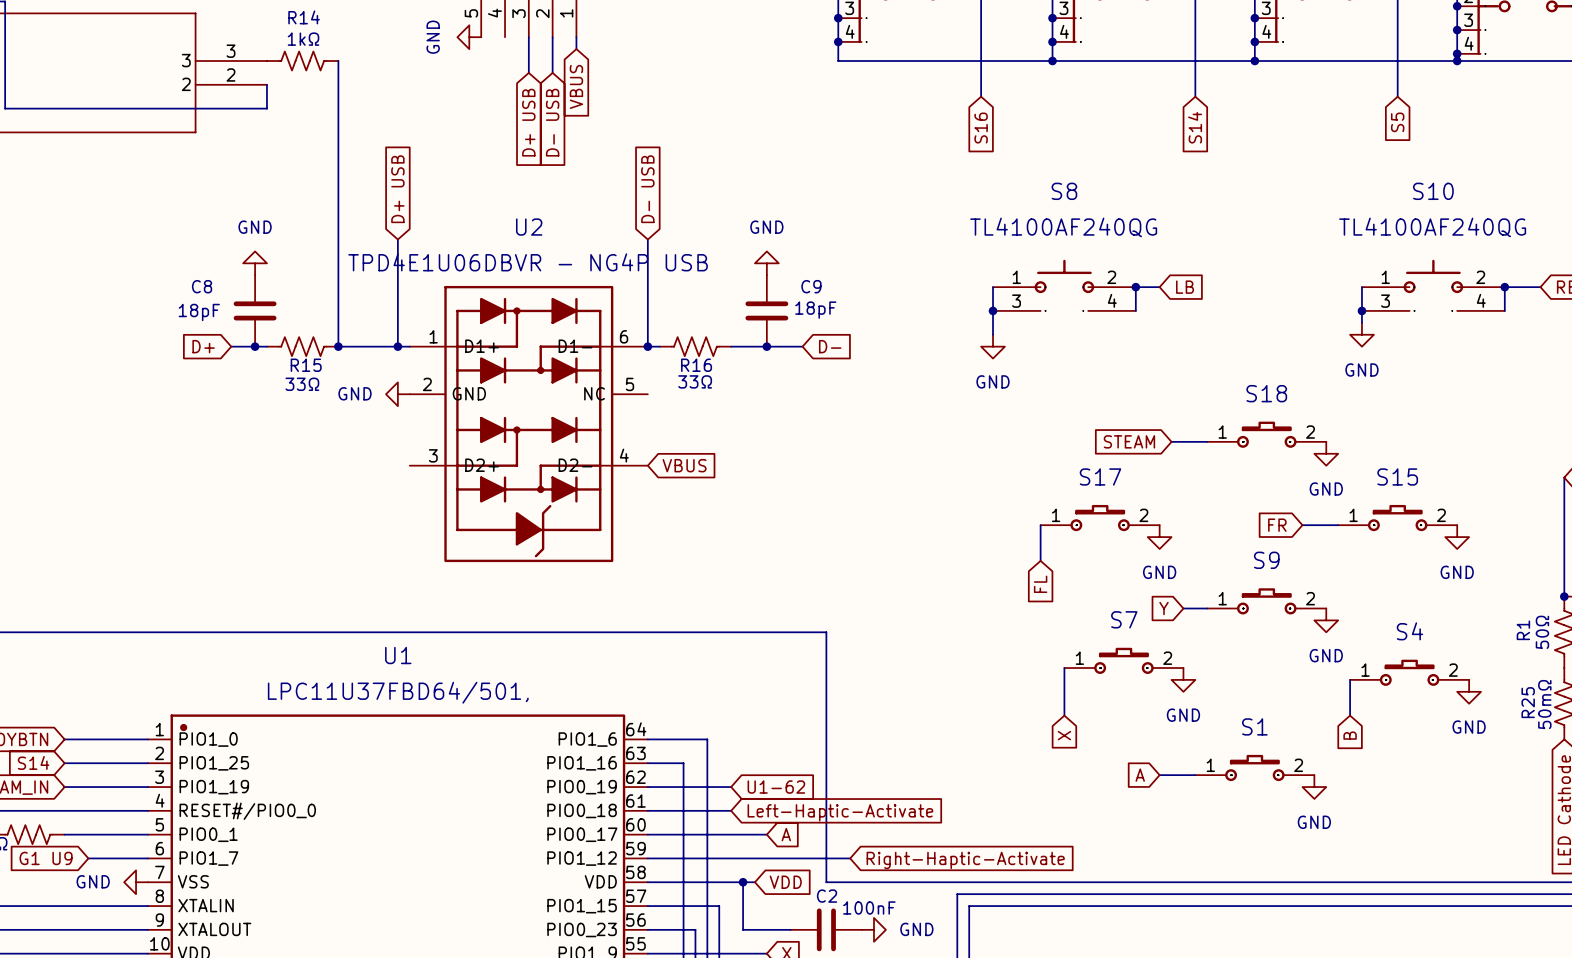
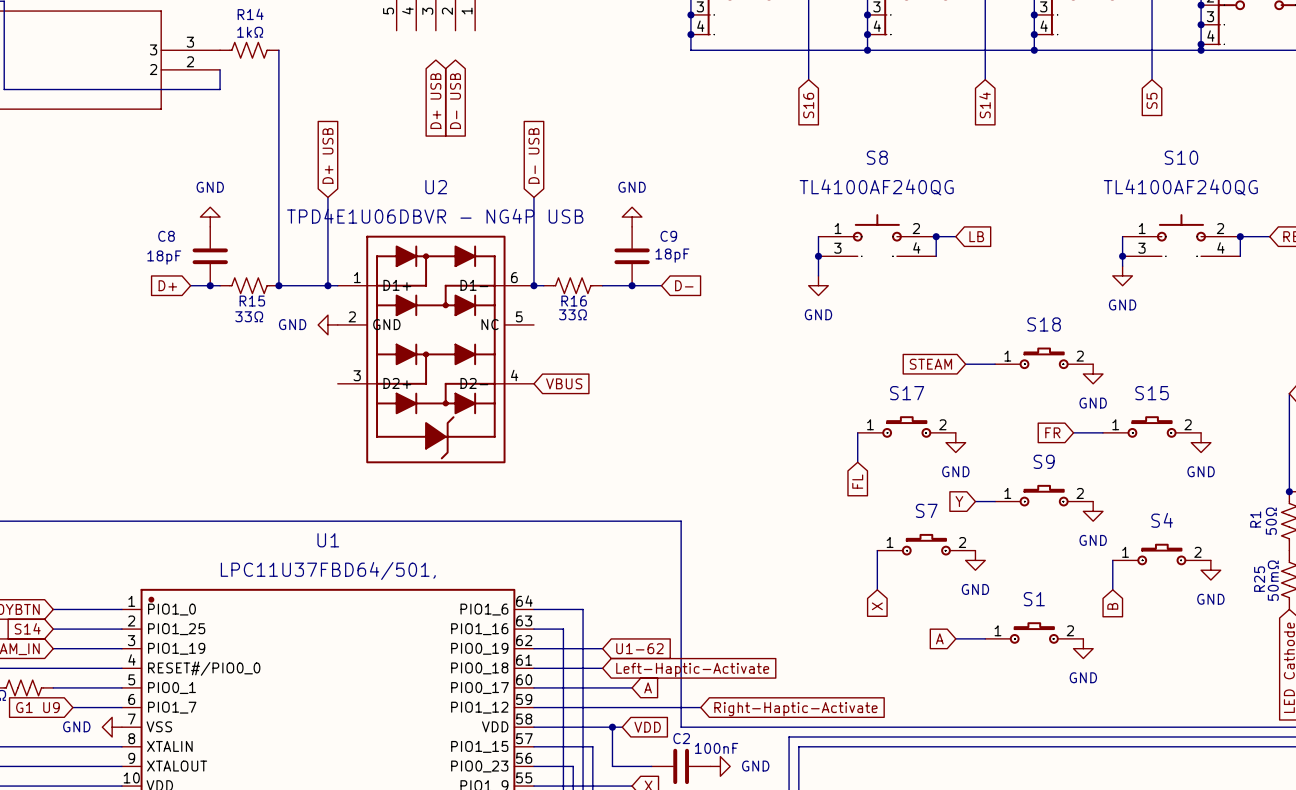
power symbol: GND (469, 37) -> none
wire: (528, 37) (528, 72) -> none
wire: (552, 37) (552, 72) -> none
wire: (576, 37) (576, 49) -> none
global label: VBUS (576, 86) -> none

